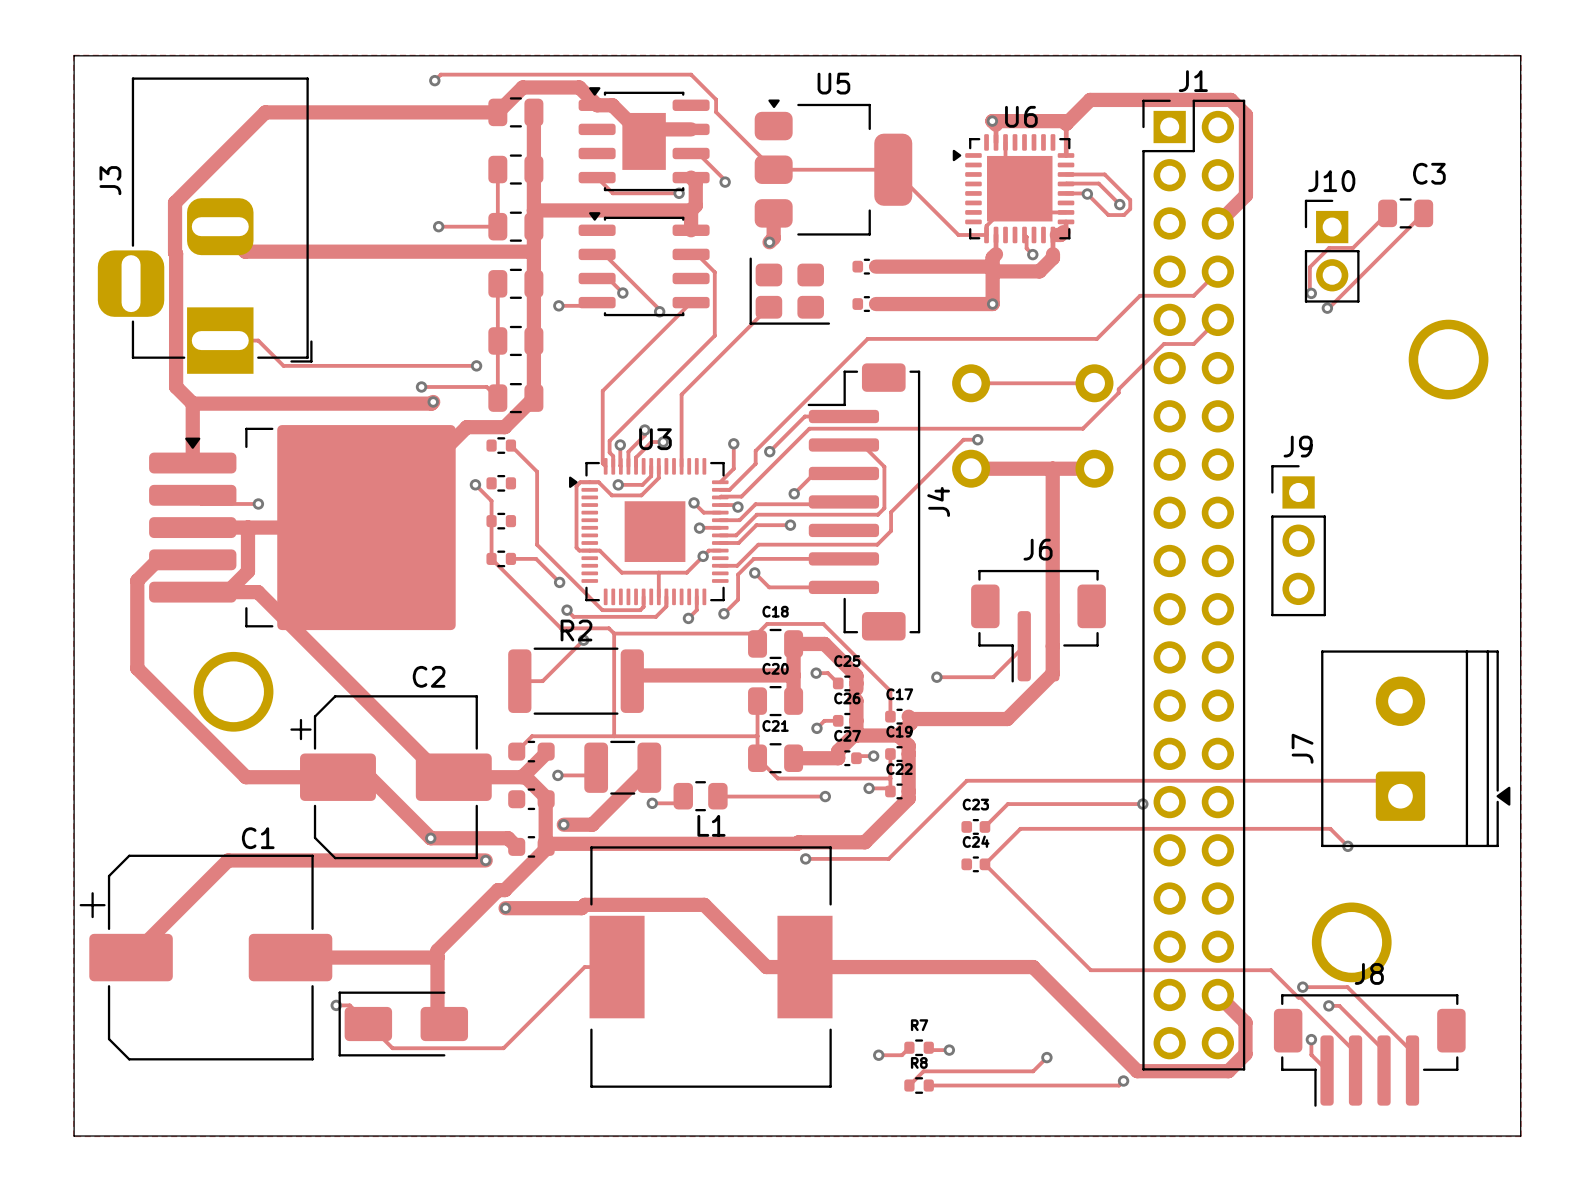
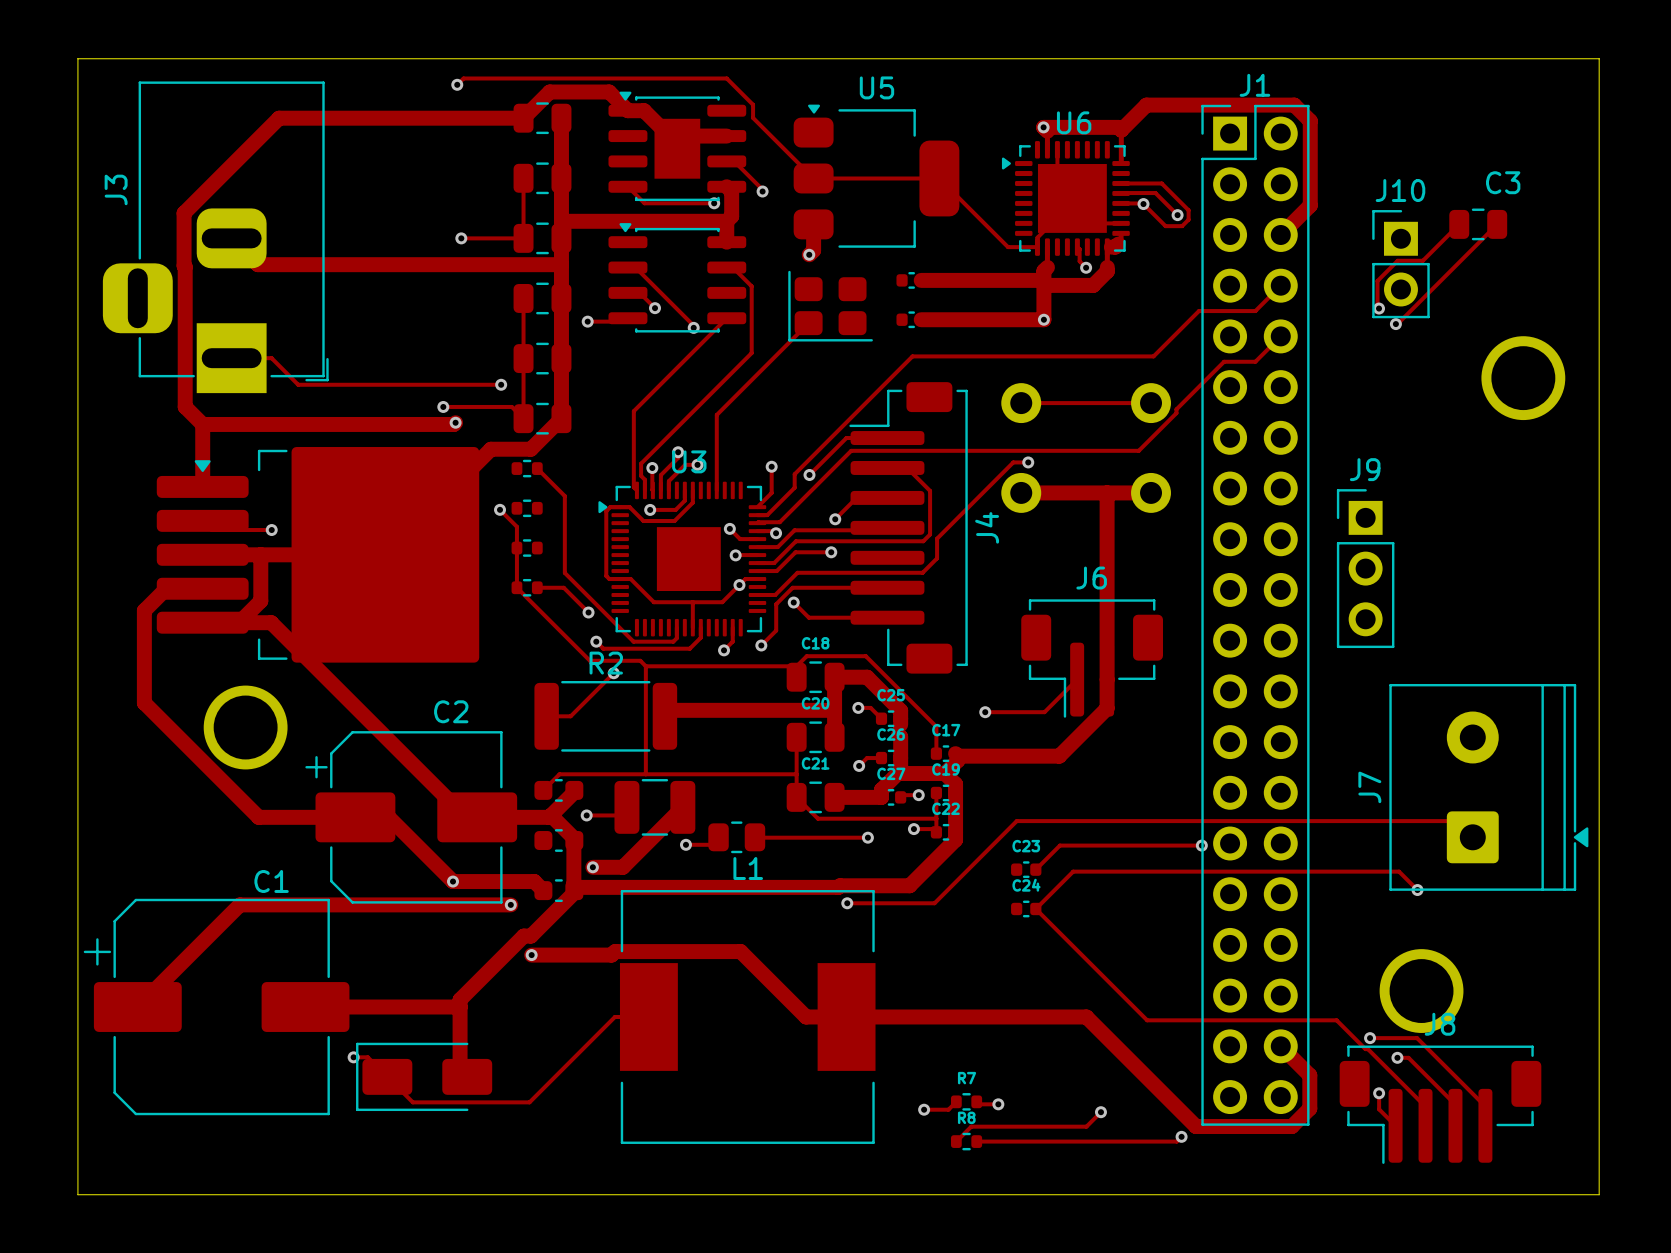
zone outline: (73, 55) (1521, 55) (1521, 1136) (73, 1136) (73, 55) -> none

